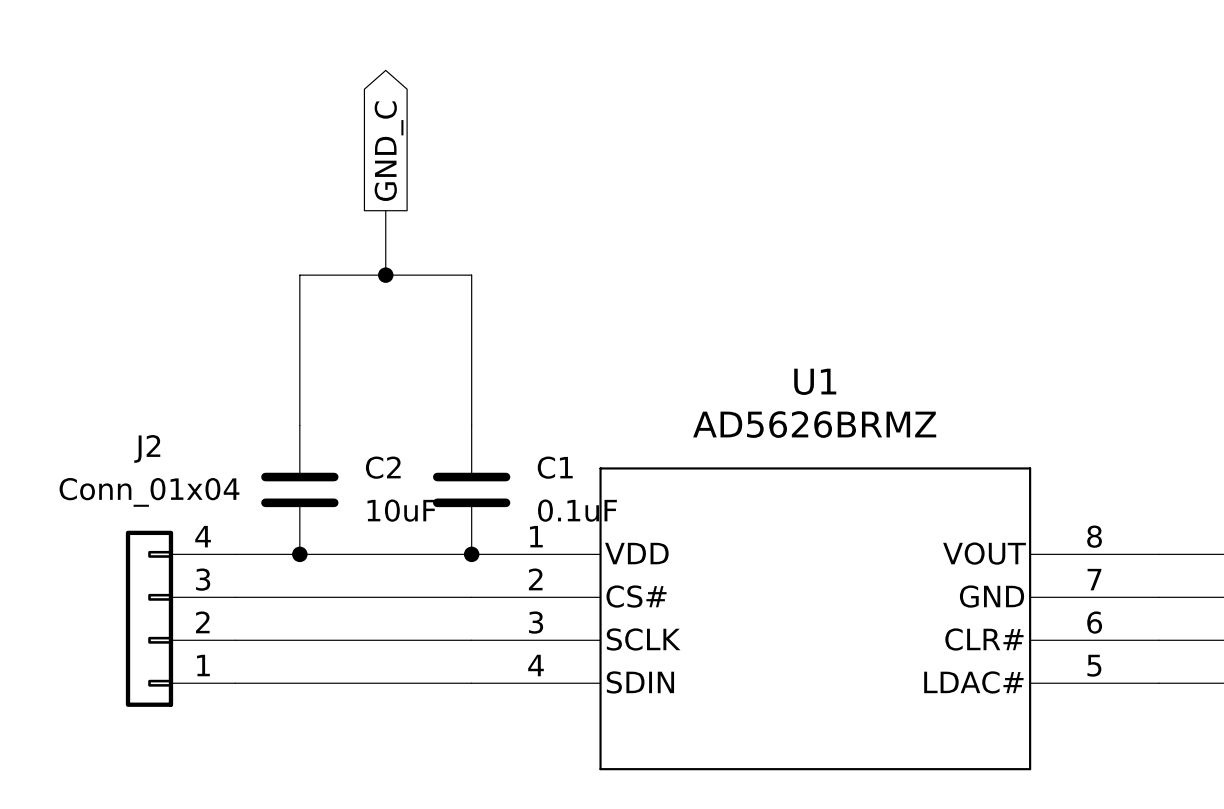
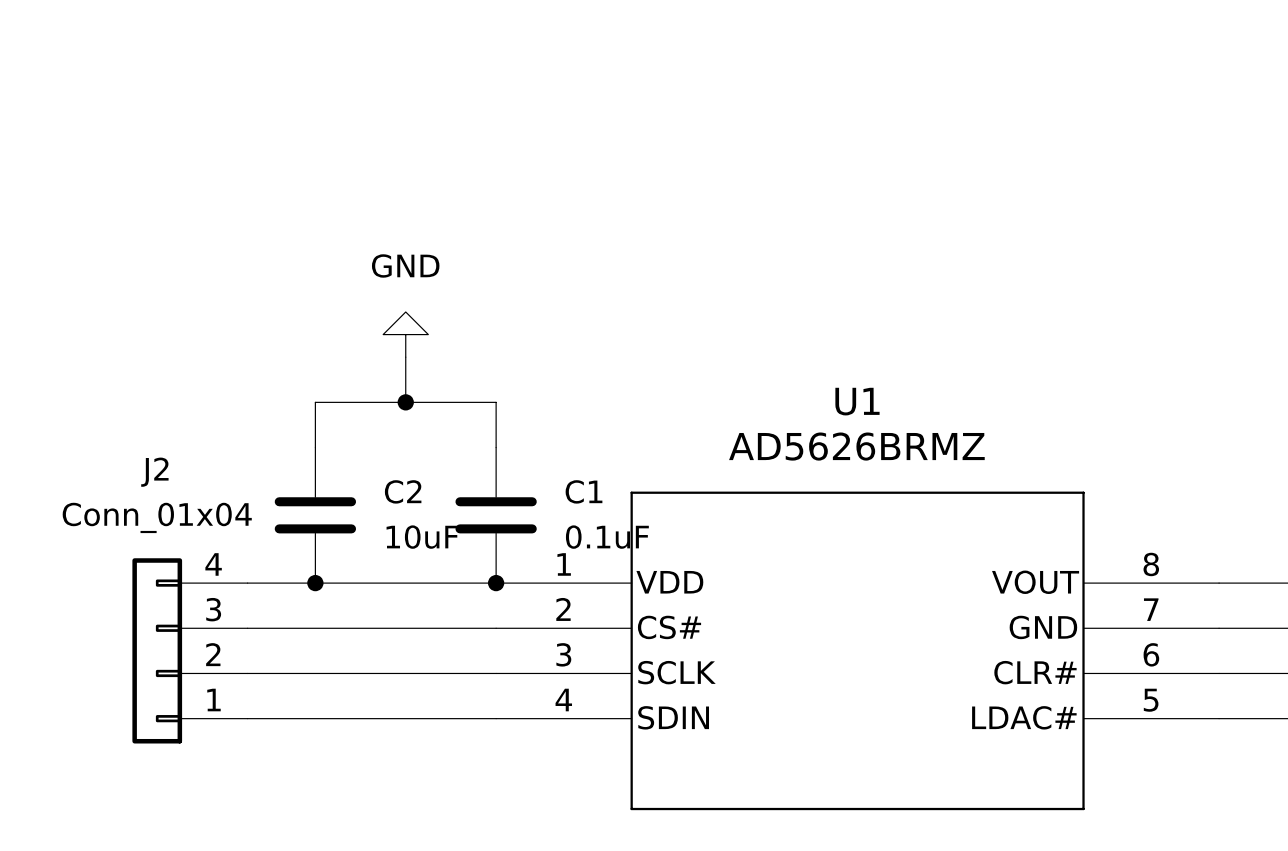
global label: GND_C (389, 151) -> none
wire: (385, 210) (385, 275) -> none
junction: (385, 275) -> none
power symbol: none -> GND (405, 334)
wire: none -> (405, 357) (405, 402)
wire: (299, 382) (299, 275) (471, 275) (471, 382) -> (315, 402) (496, 402)
junction: none -> (405, 402)

